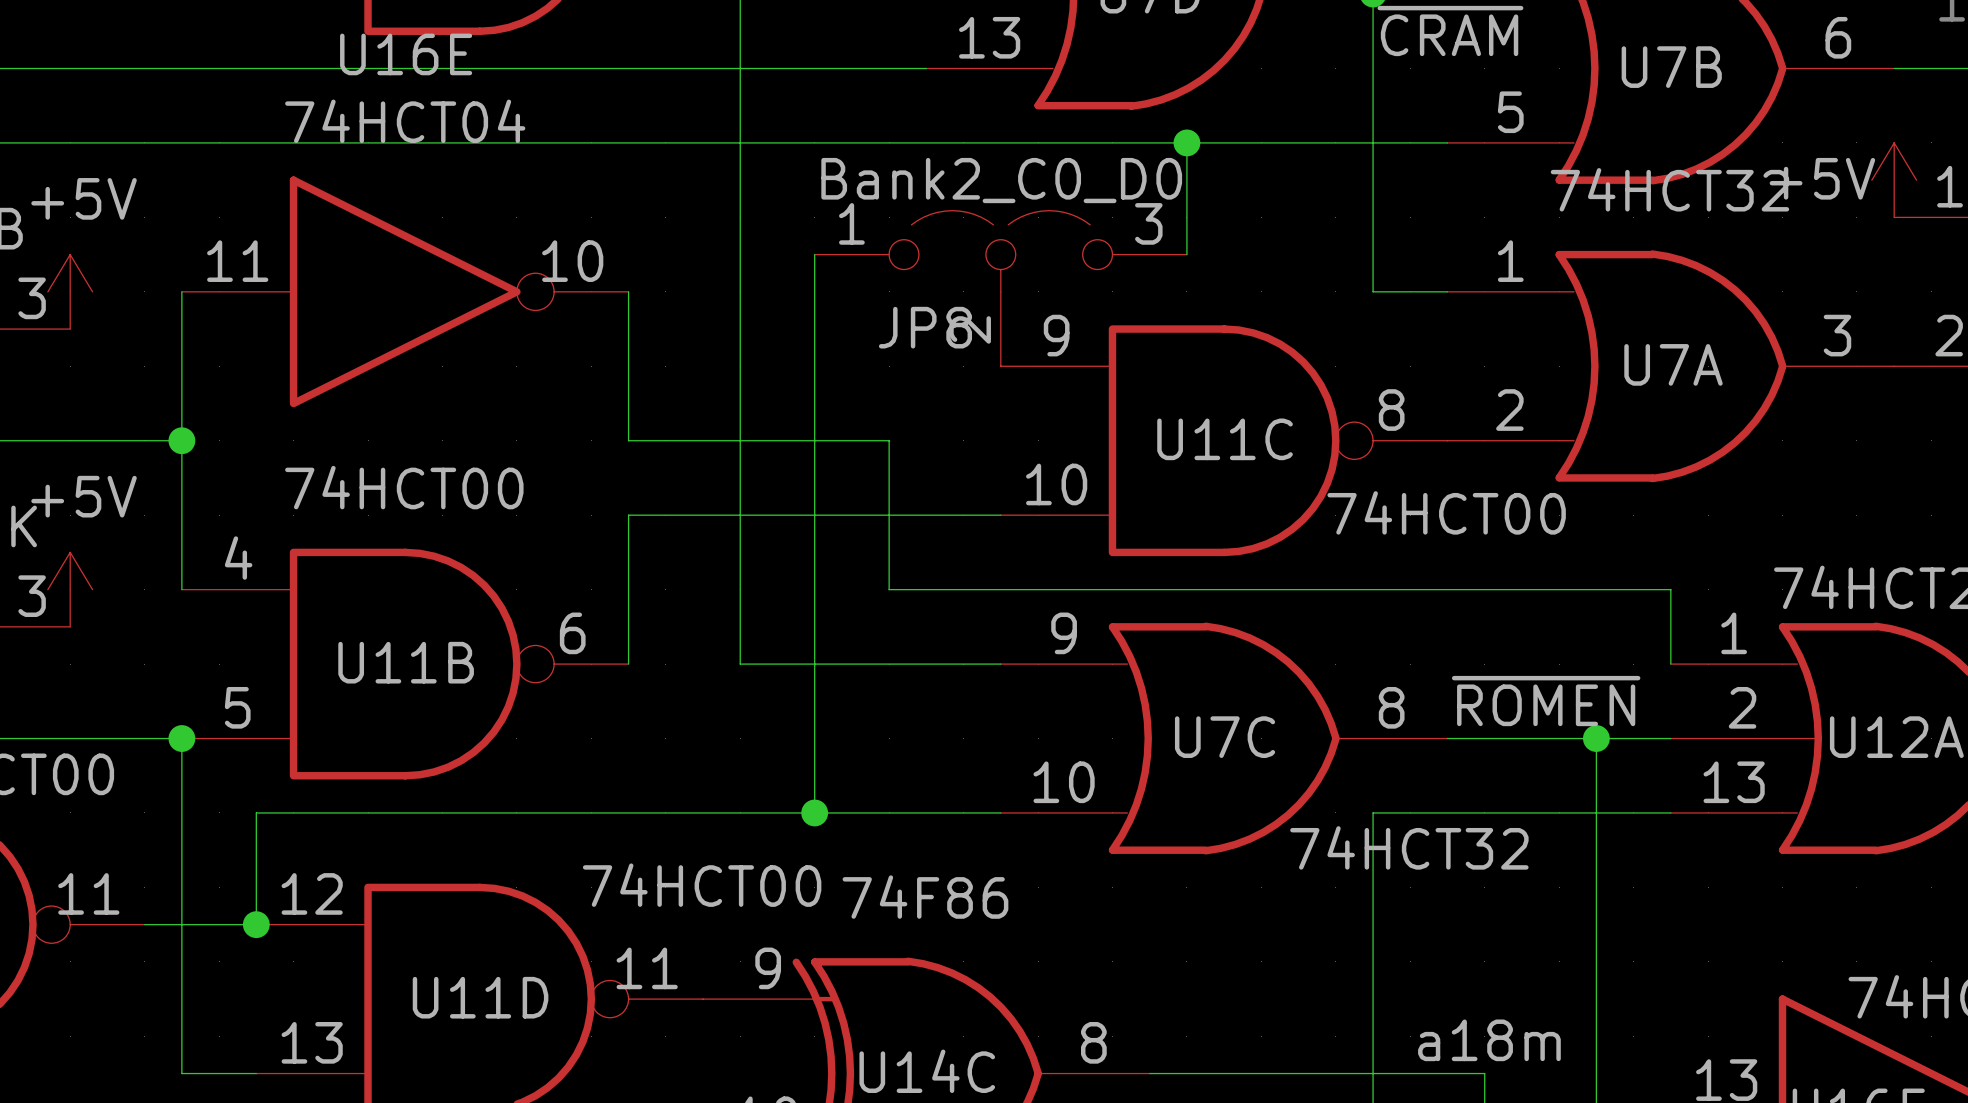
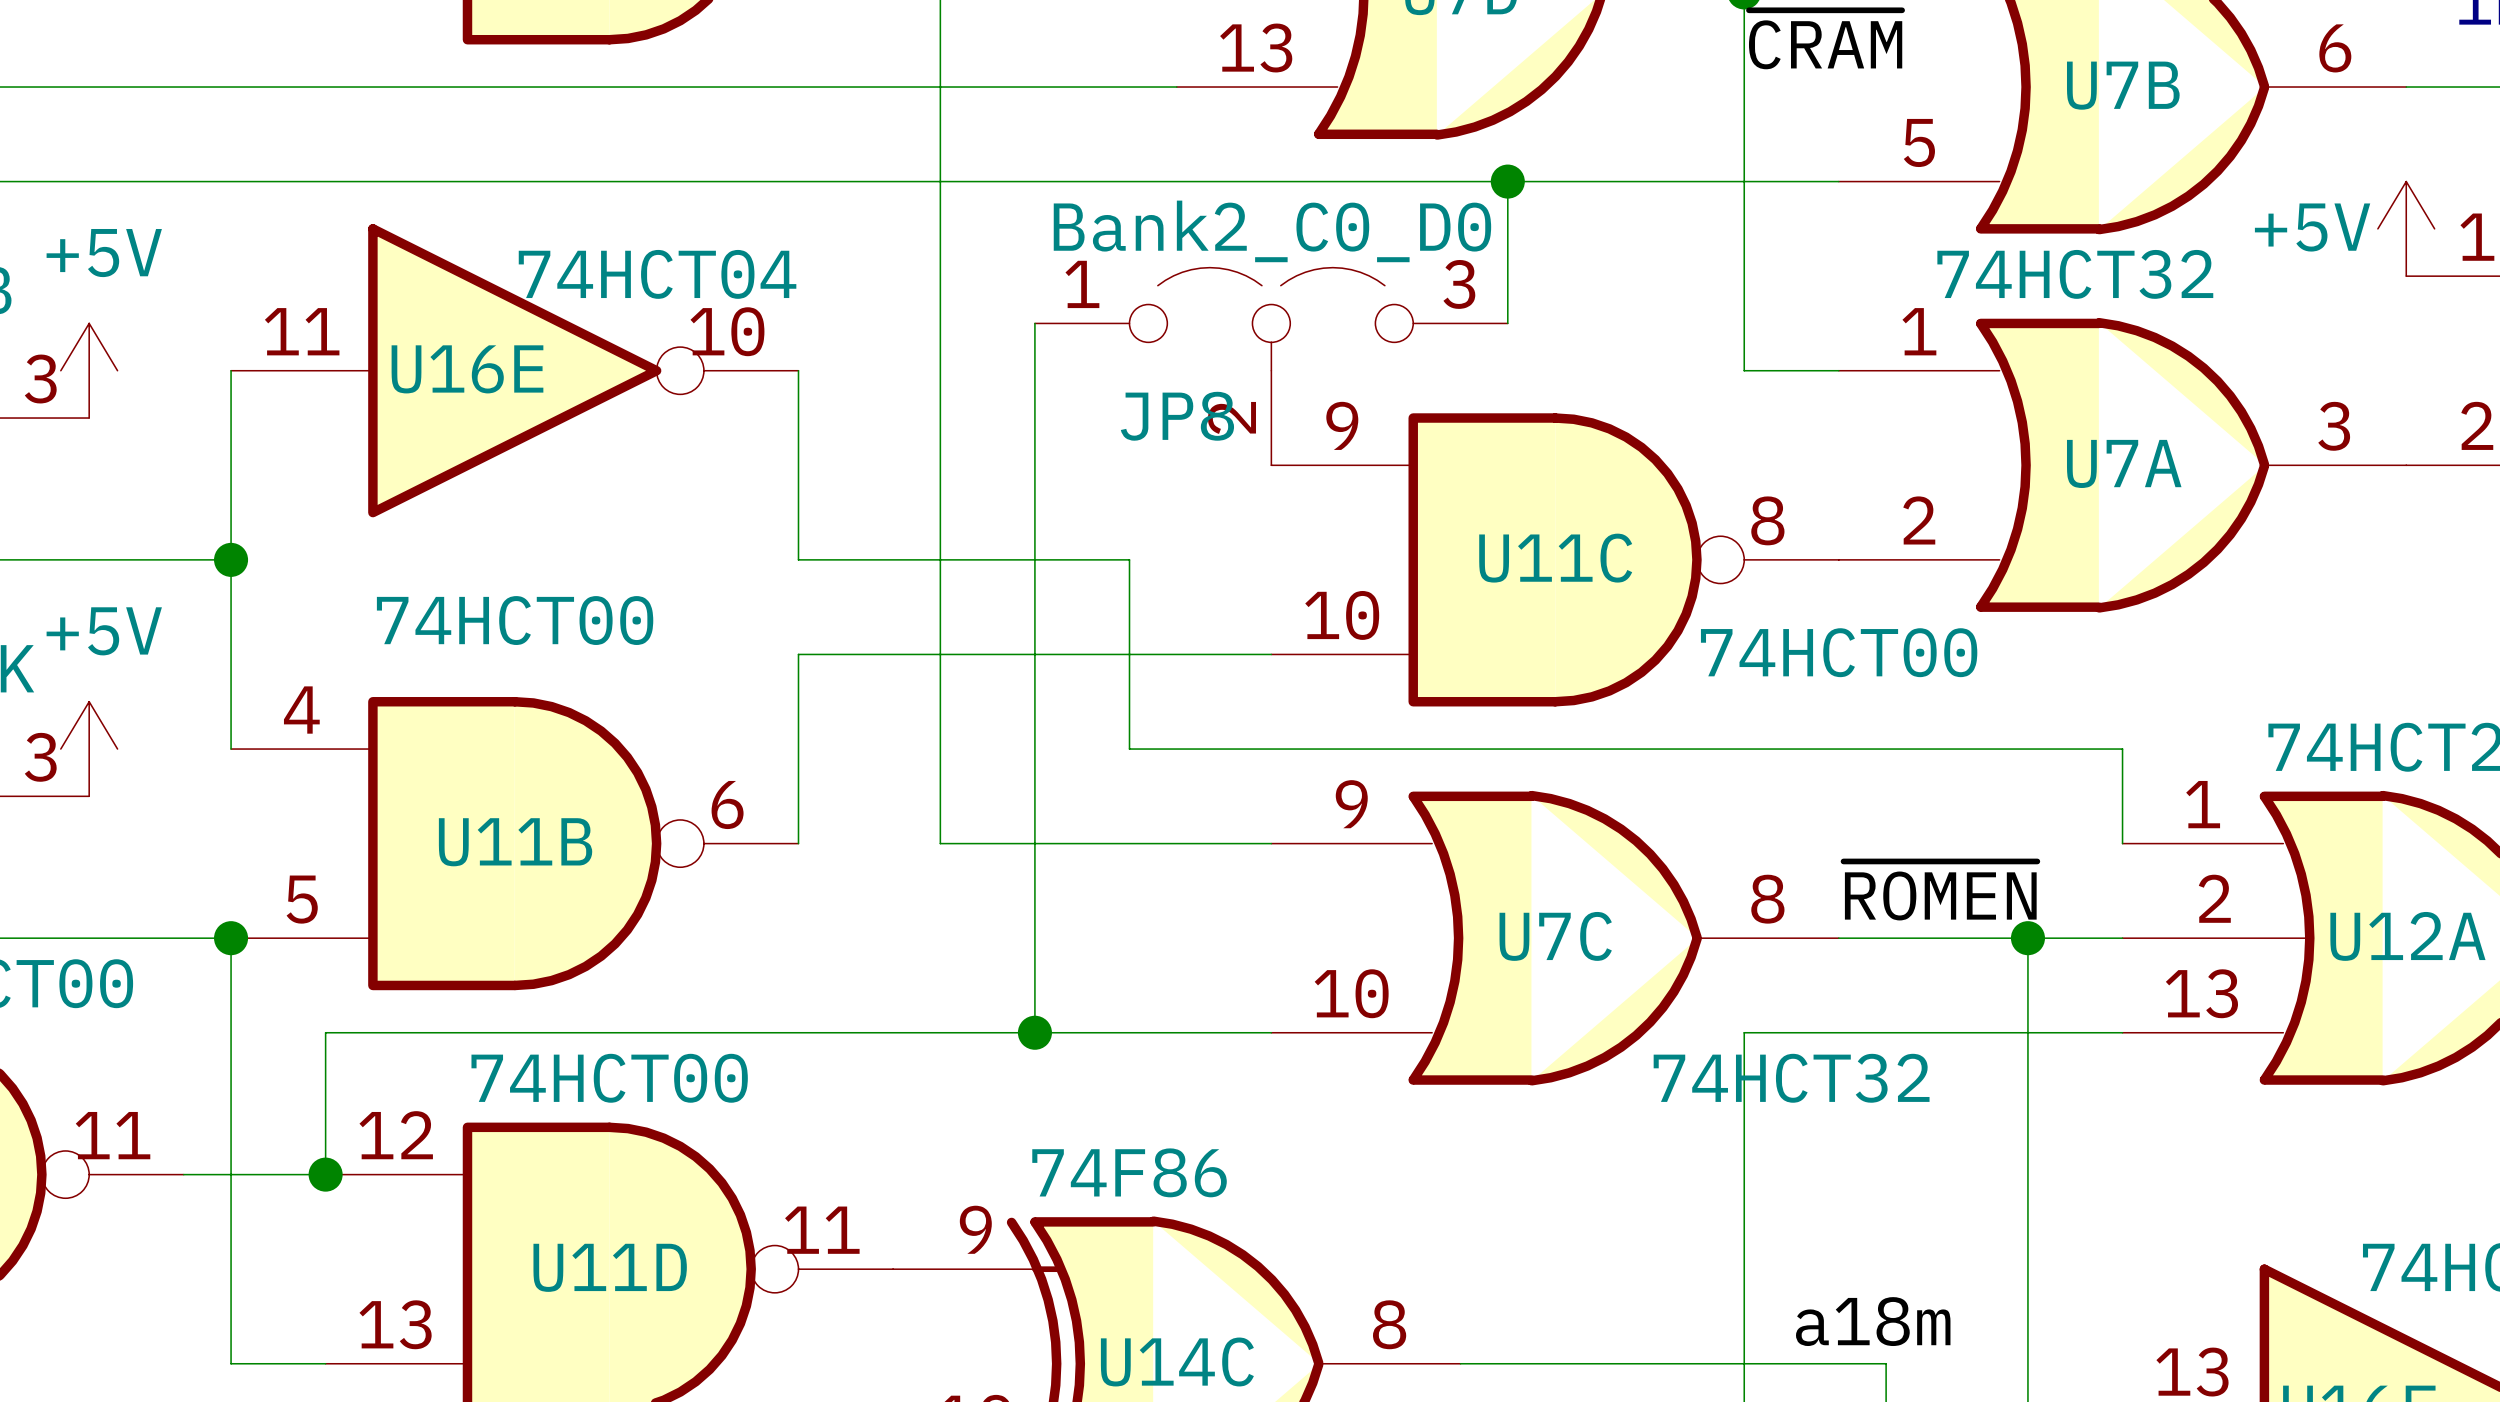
U16E name position: U16E (406, 54) -> U16E (467, 369)
U16E value position: 74HCT04 (405, 121) -> 74HCT04 (657, 274)
U7A value position: 74HCT32 (1669, 189) -> 74HCT32 (2075, 274)
U11D value position: 74HCT00 (702, 885) -> 74HCT00 (609, 1078)
U14C value position: 74F86 (925, 897) -> 74F86 (1129, 1172)

